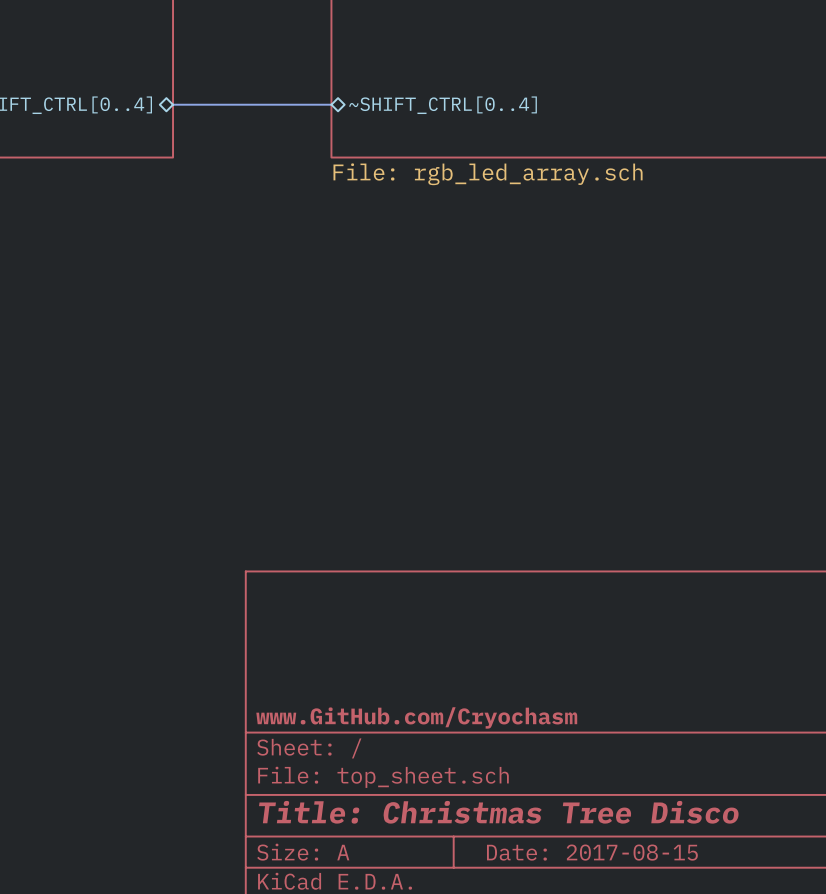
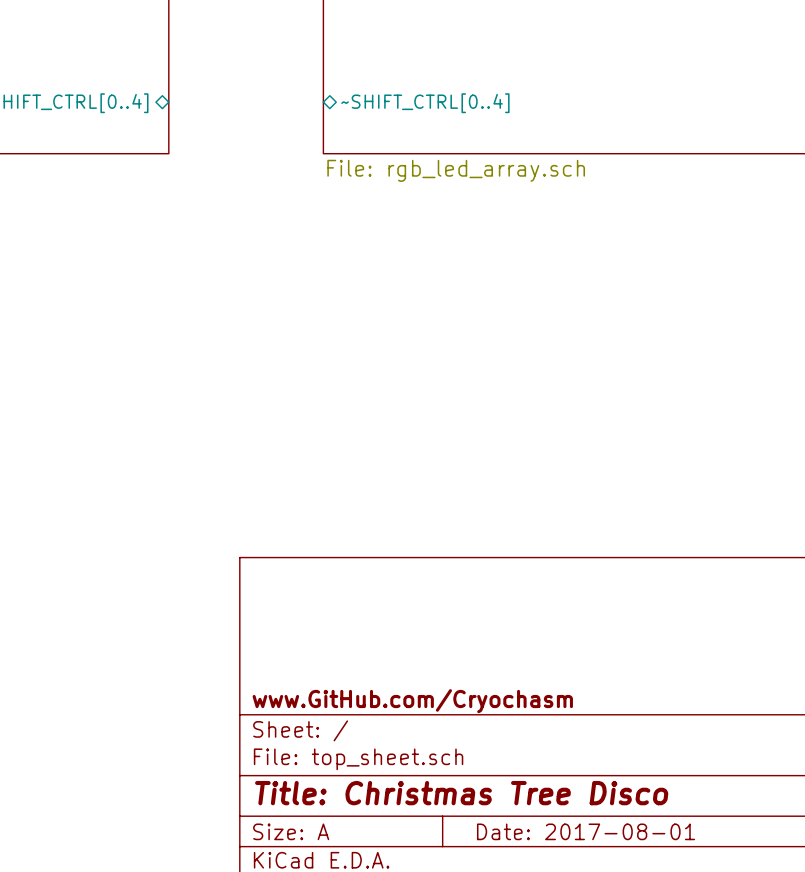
bus: (173, 104) (331, 104) -> none
title block: Date: 2017-08-15 (592, 852) -> Date: 2017-08-01 (586, 831)

